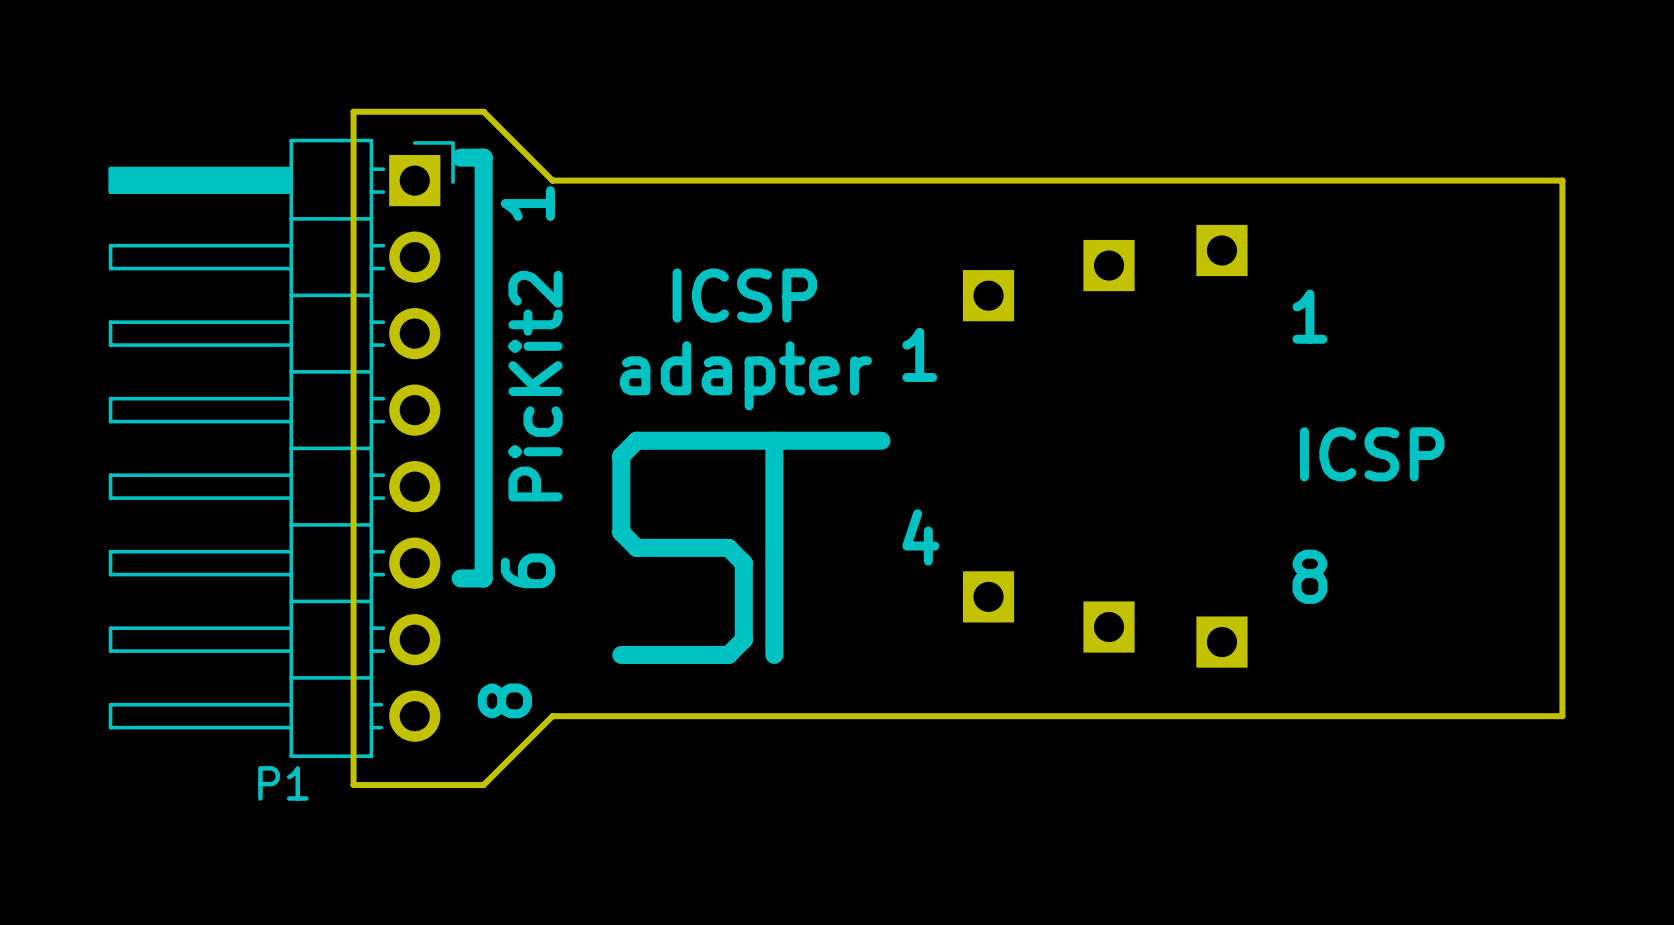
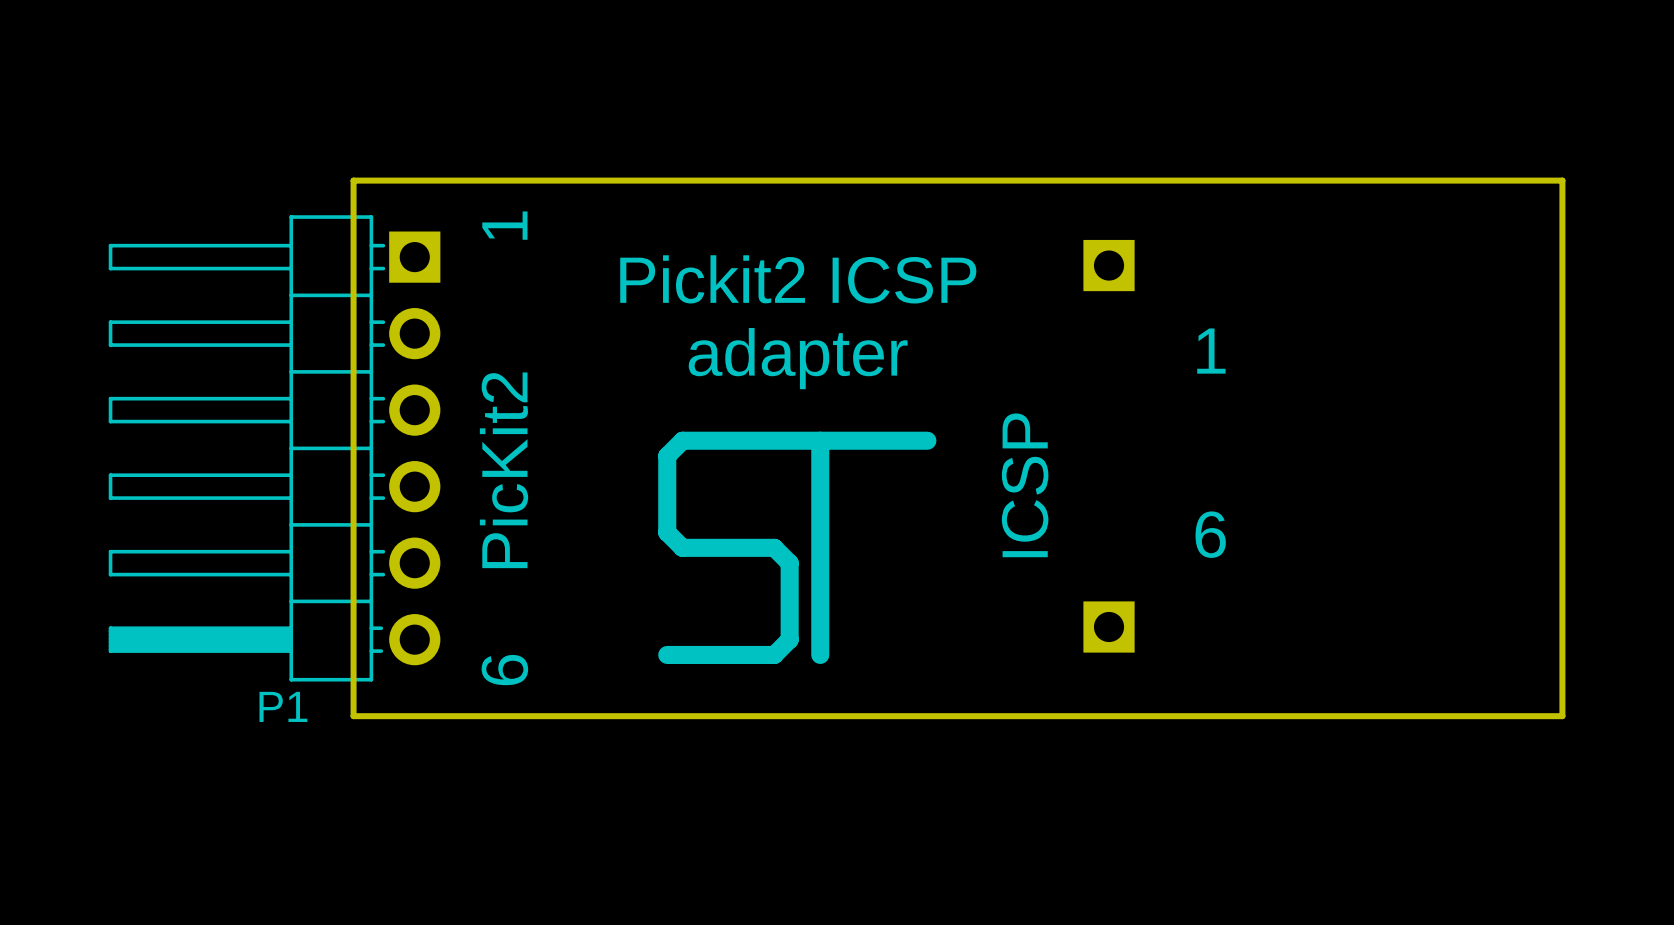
P1 footprint: [108, 138, 455, 759] -> [108, 215, 441, 682]
line: (460, 157) (483, 157) (483, 578) (460, 578) -> none
board edge: (353, 180) (353, 111) (483, 111) (552, 180) -> (353, 180) (552, 180)
text position: 1 (527, 203) -> 1 (504, 225)
part: (1221, 250) -> none
text: none -> Pickit2 ICSP (798, 279)
text: ICSP (744, 295) -> none
part: (988, 295) -> none
text position: 1 (1309, 316) -> 1 (1211, 351)
text: 1 (919, 354) -> none
text position: adapter (745, 375) -> adapter (798, 358)
text position: PicKit2 (535, 386) -> PicKit2 (504, 470)
line: (682, 440) (636, 440) (621, 456) (621, 532) (636, 547) (682, 547) -> (682, 440) (667, 456) (667, 532) (682, 547)
line: (774, 440) (774, 654) -> (820, 440) (820, 654)
text: ICSP (1372, 454) -> none
text: none -> ICSP (1025, 485)
text: none -> 6 (1210, 534)
text: 4 (920, 537) -> none
line: (728, 547) (743, 563) (743, 639) (728, 654) -> (728, 547) (774, 547) (789, 563) (789, 639) (774, 654) (728, 654)
text position: 6 (527, 570) -> 6 (504, 670)
text: 8 (1309, 576) -> none
part: (988, 596) -> none
part: (1221, 642) -> none
line: (621, 654) (667, 654) -> (881, 440) (927, 440)
text: 8 (504, 700) -> none
board edge: (353, 716) (353, 785) (483, 785) (552, 716) -> (353, 716) (552, 716)
P1 name position: P1 (283, 783) -> P1 (283, 706)

